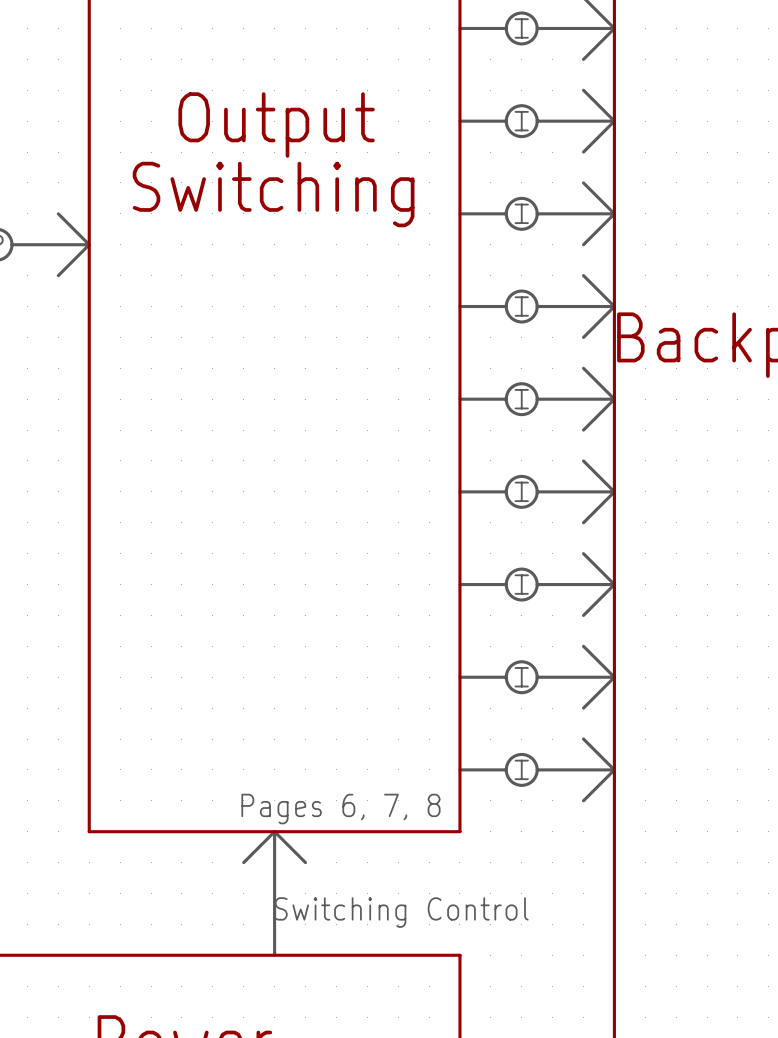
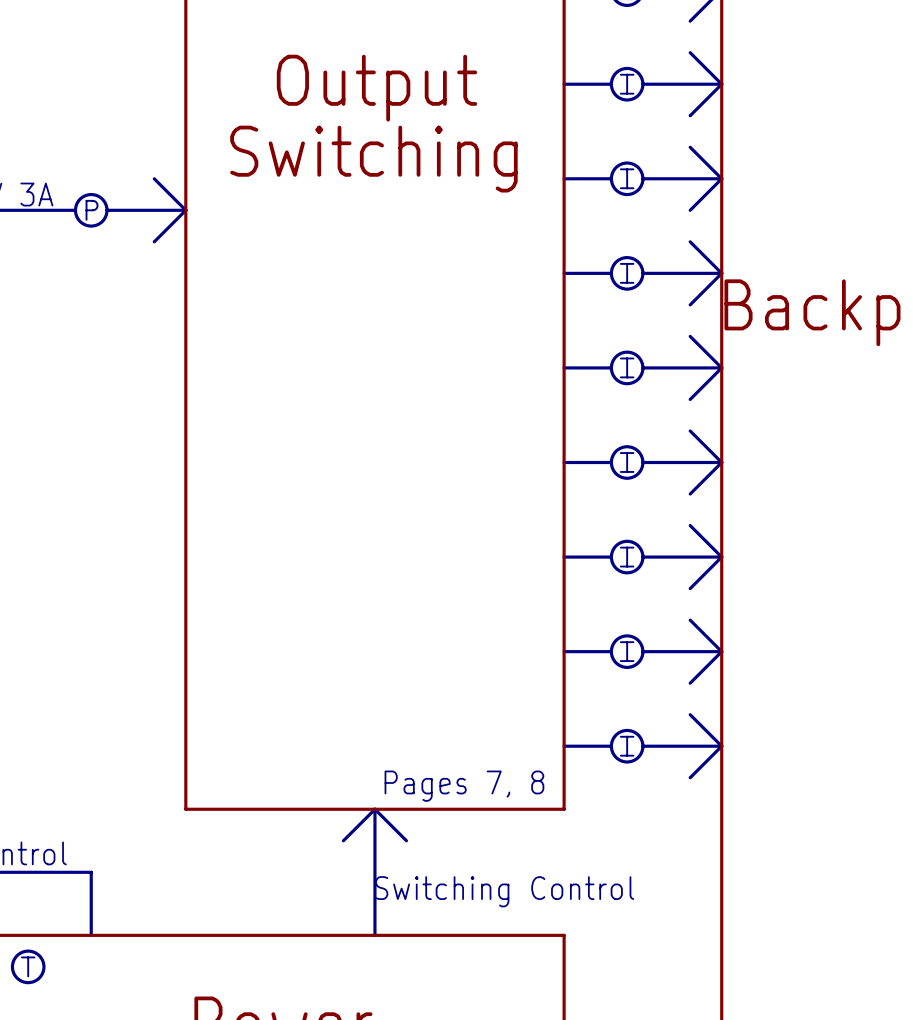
text: Pages 6, 7, 8 (340, 809) -> Pages 7, 8 (464, 786)

